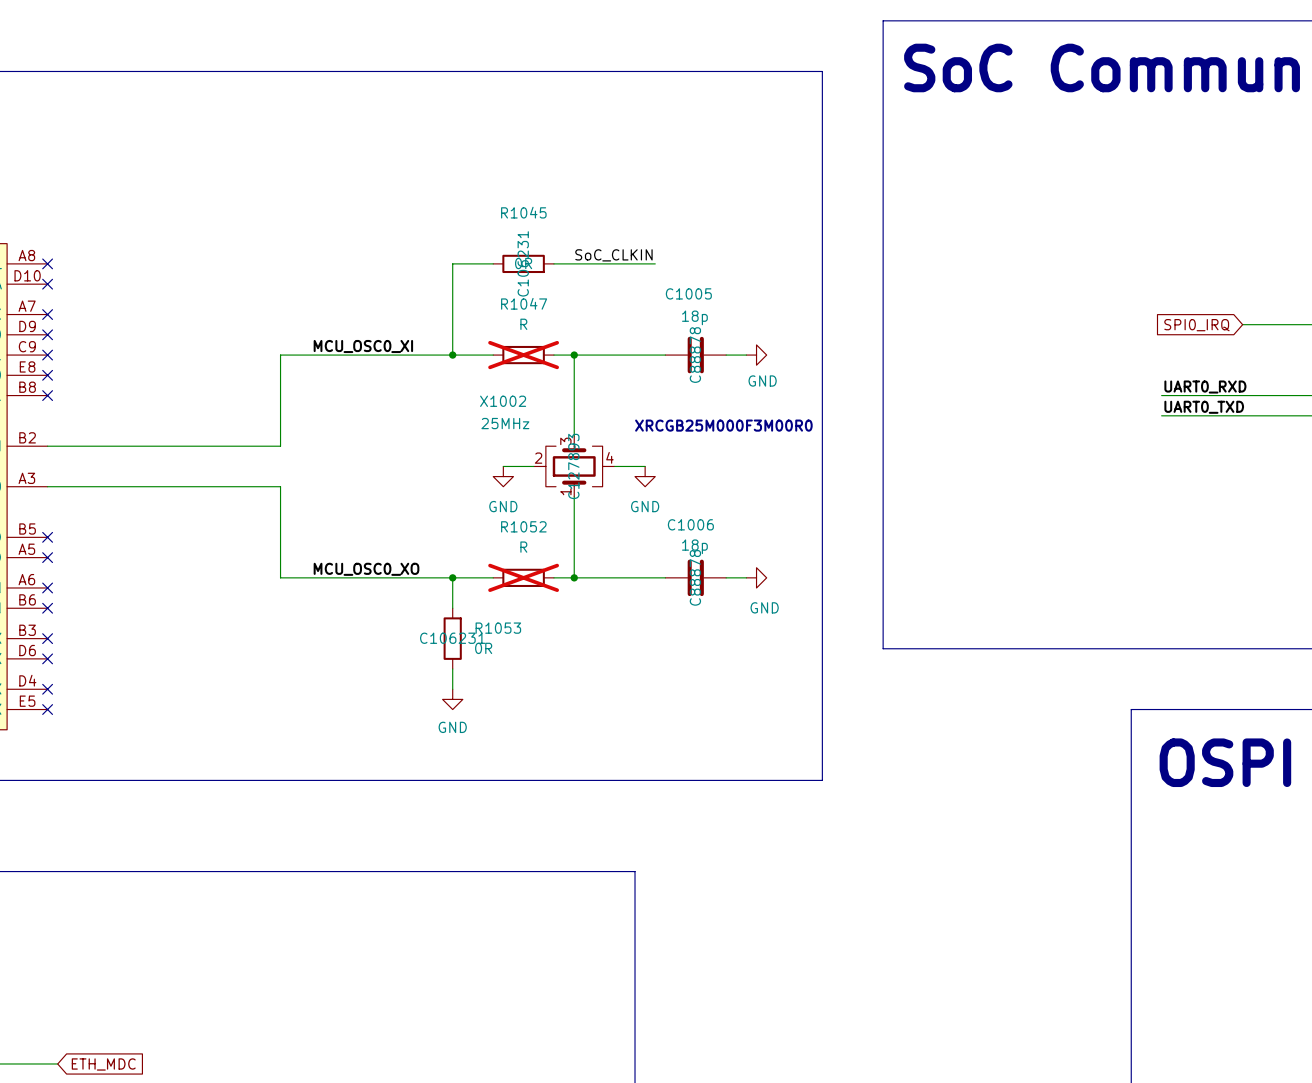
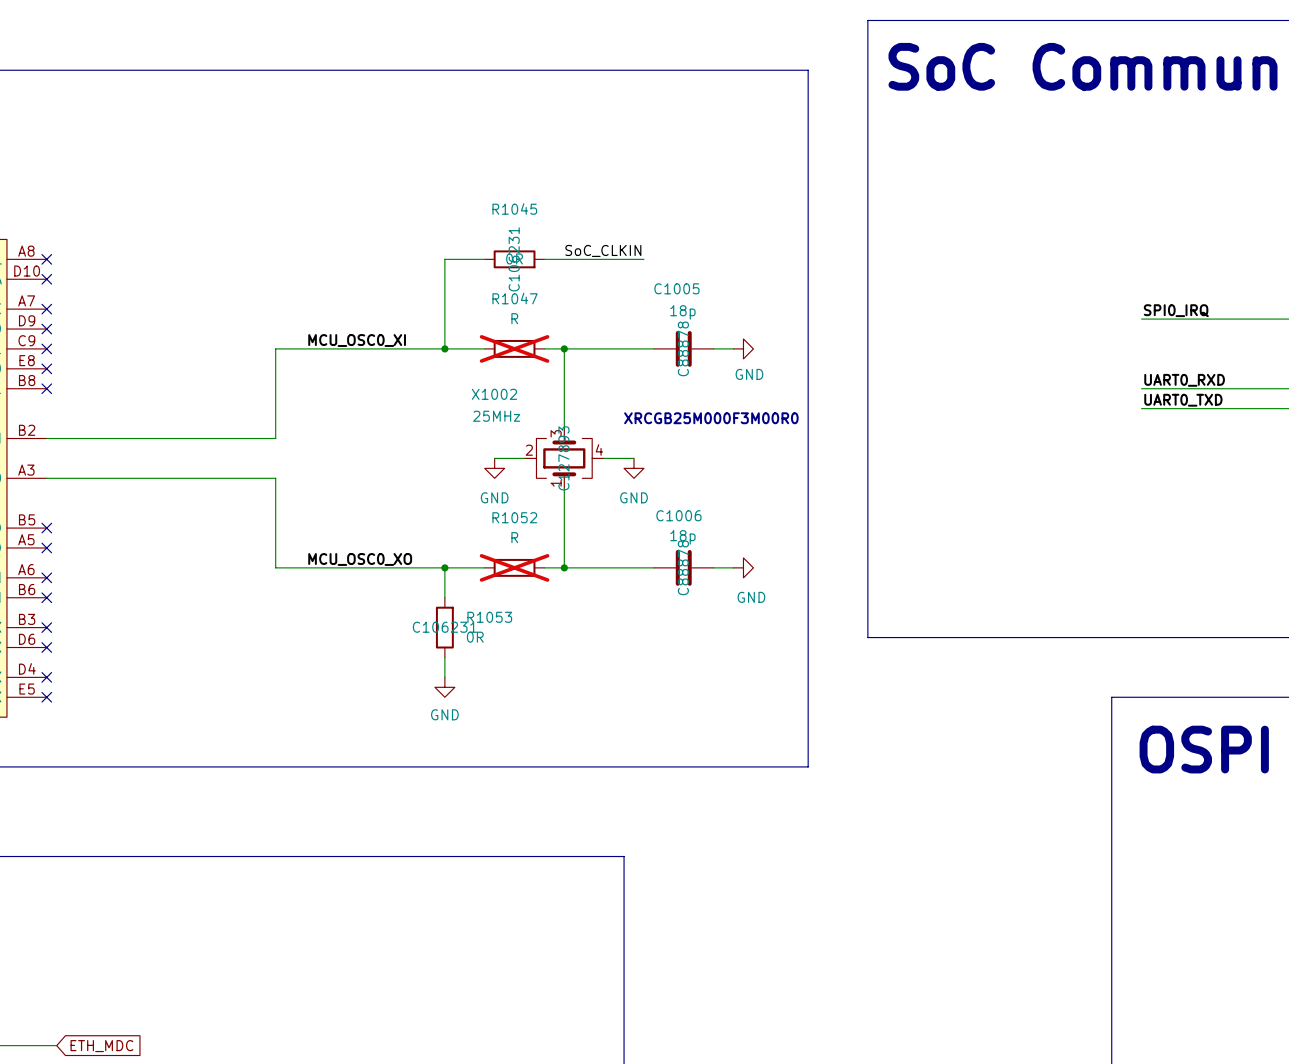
label: none -> SPI0_IRQ (1176, 310)
wire: none -> (1141, 319) (1221, 319)
global label: SPI0_IRQ (1196, 325) -> none

